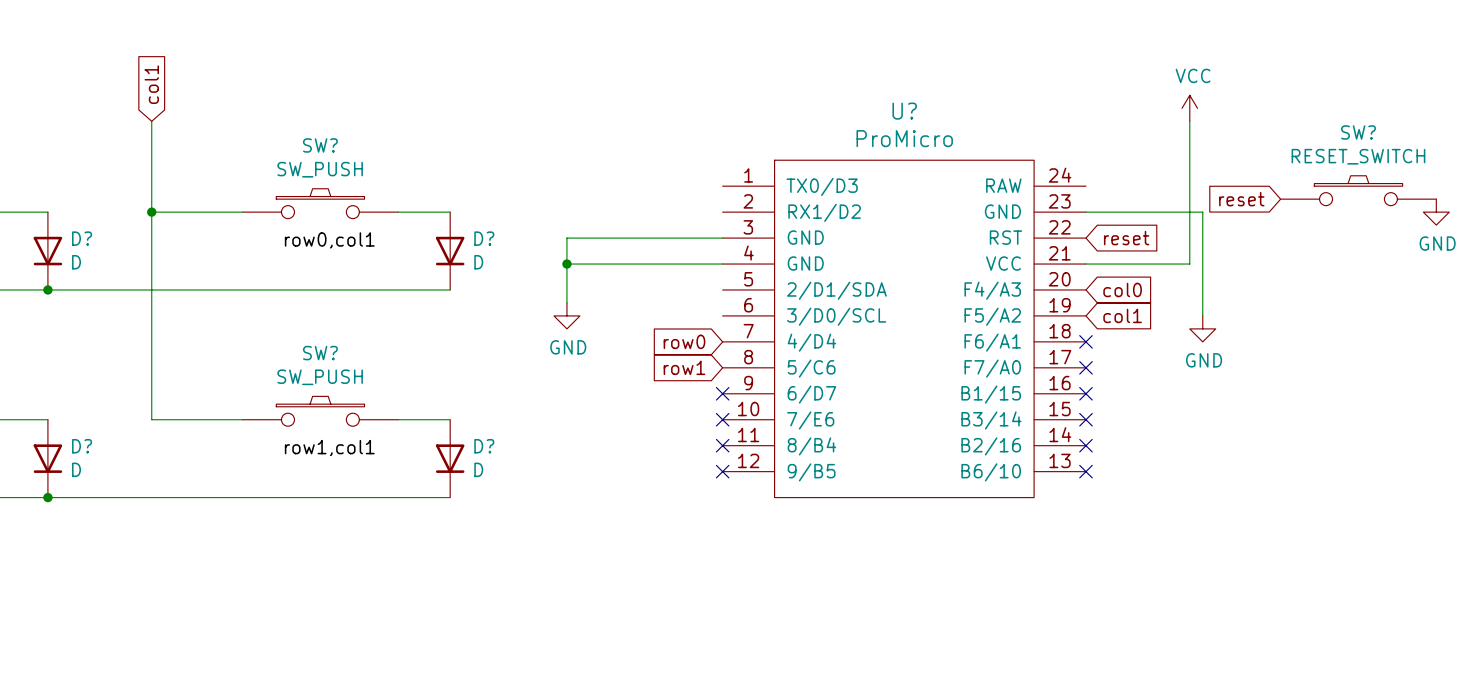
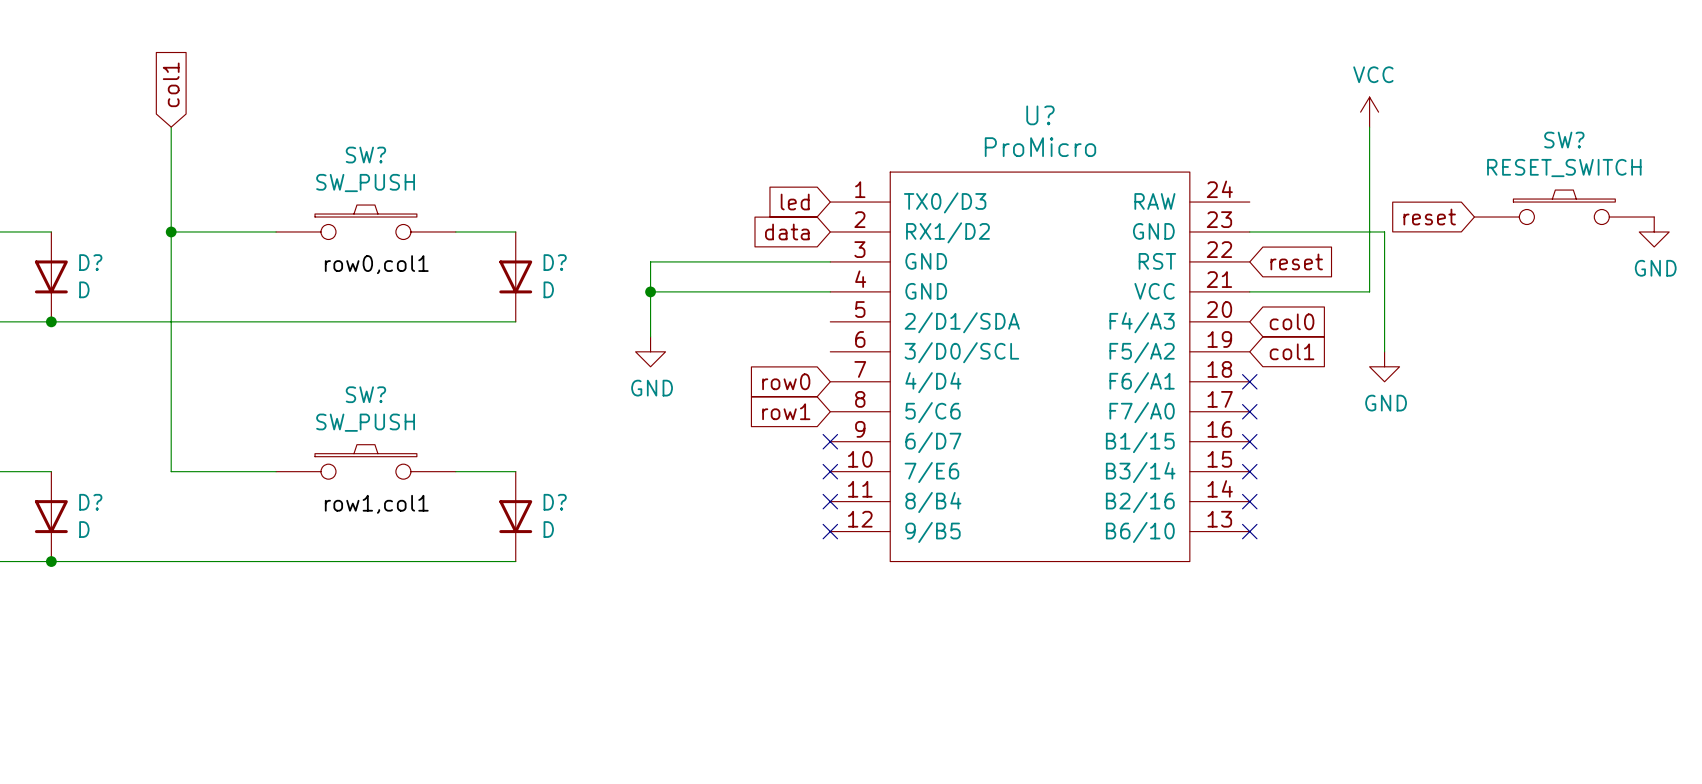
global label: none -> led (795, 202)
global label: none -> data (787, 231)

